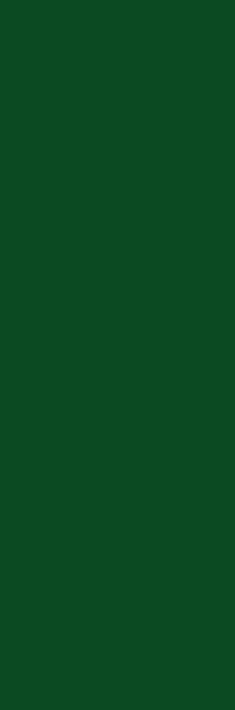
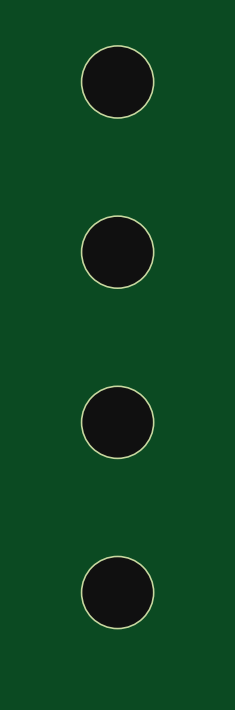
part: none -> (117, 81)
part: none -> (117, 252)
part: none -> (117, 422)
part: none -> (117, 592)

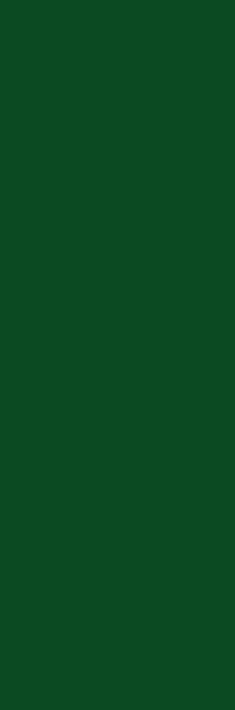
part: (117, 81) -> none
part: (117, 252) -> none
part: (117, 422) -> none
part: (117, 592) -> none

